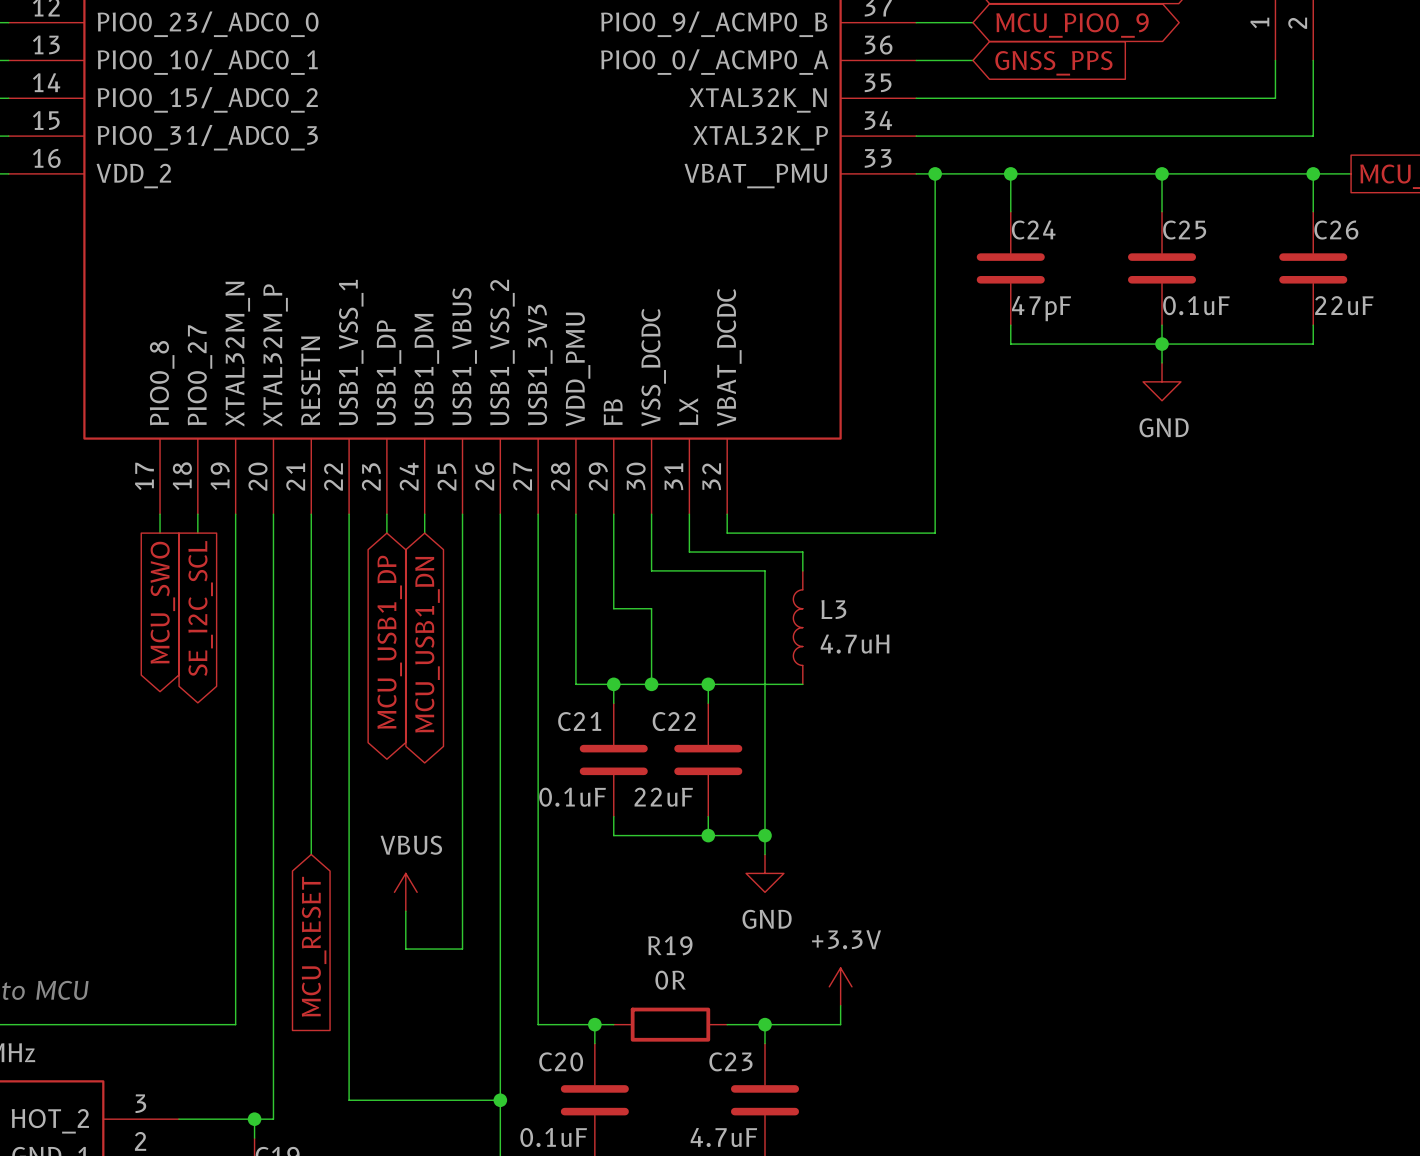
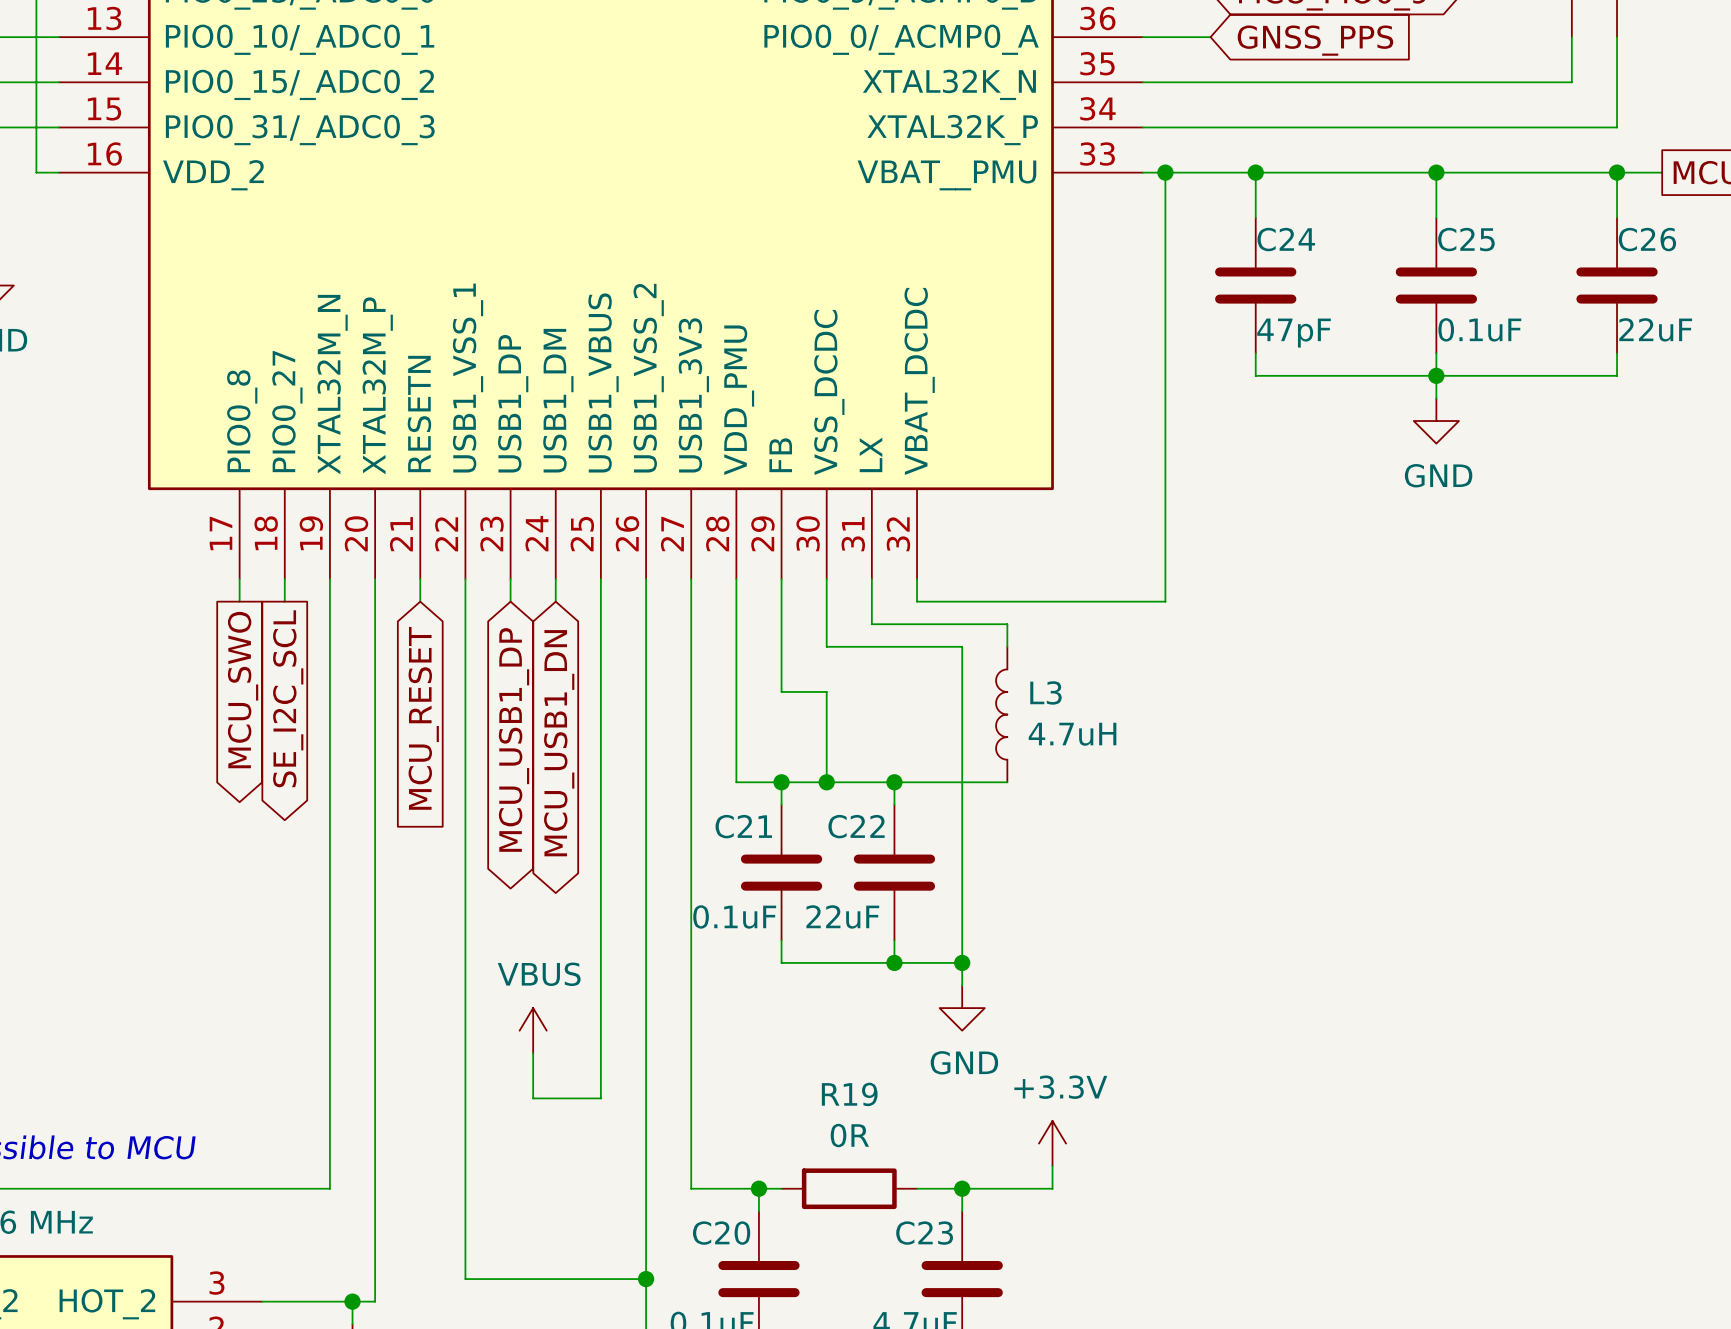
wire: (311, 533) (311, 854) -> none
global label position: MCU_RESET (314, 946) -> MCU_RESET (423, 718)

